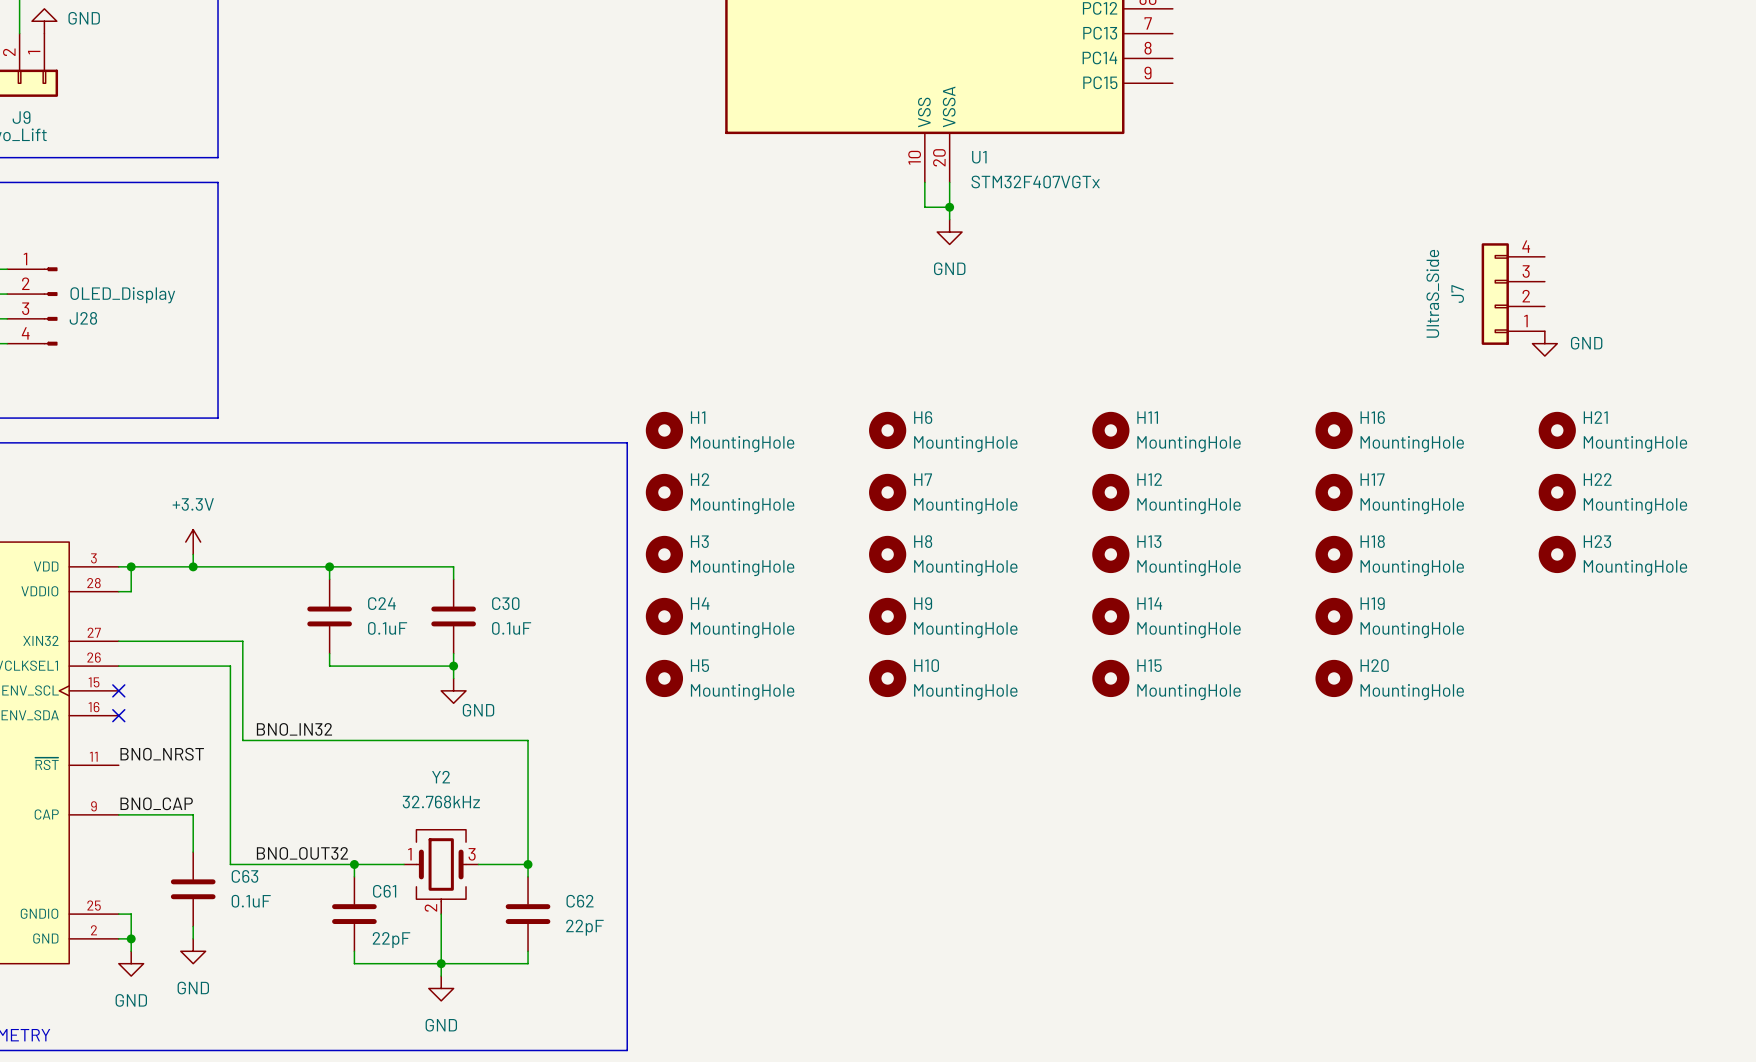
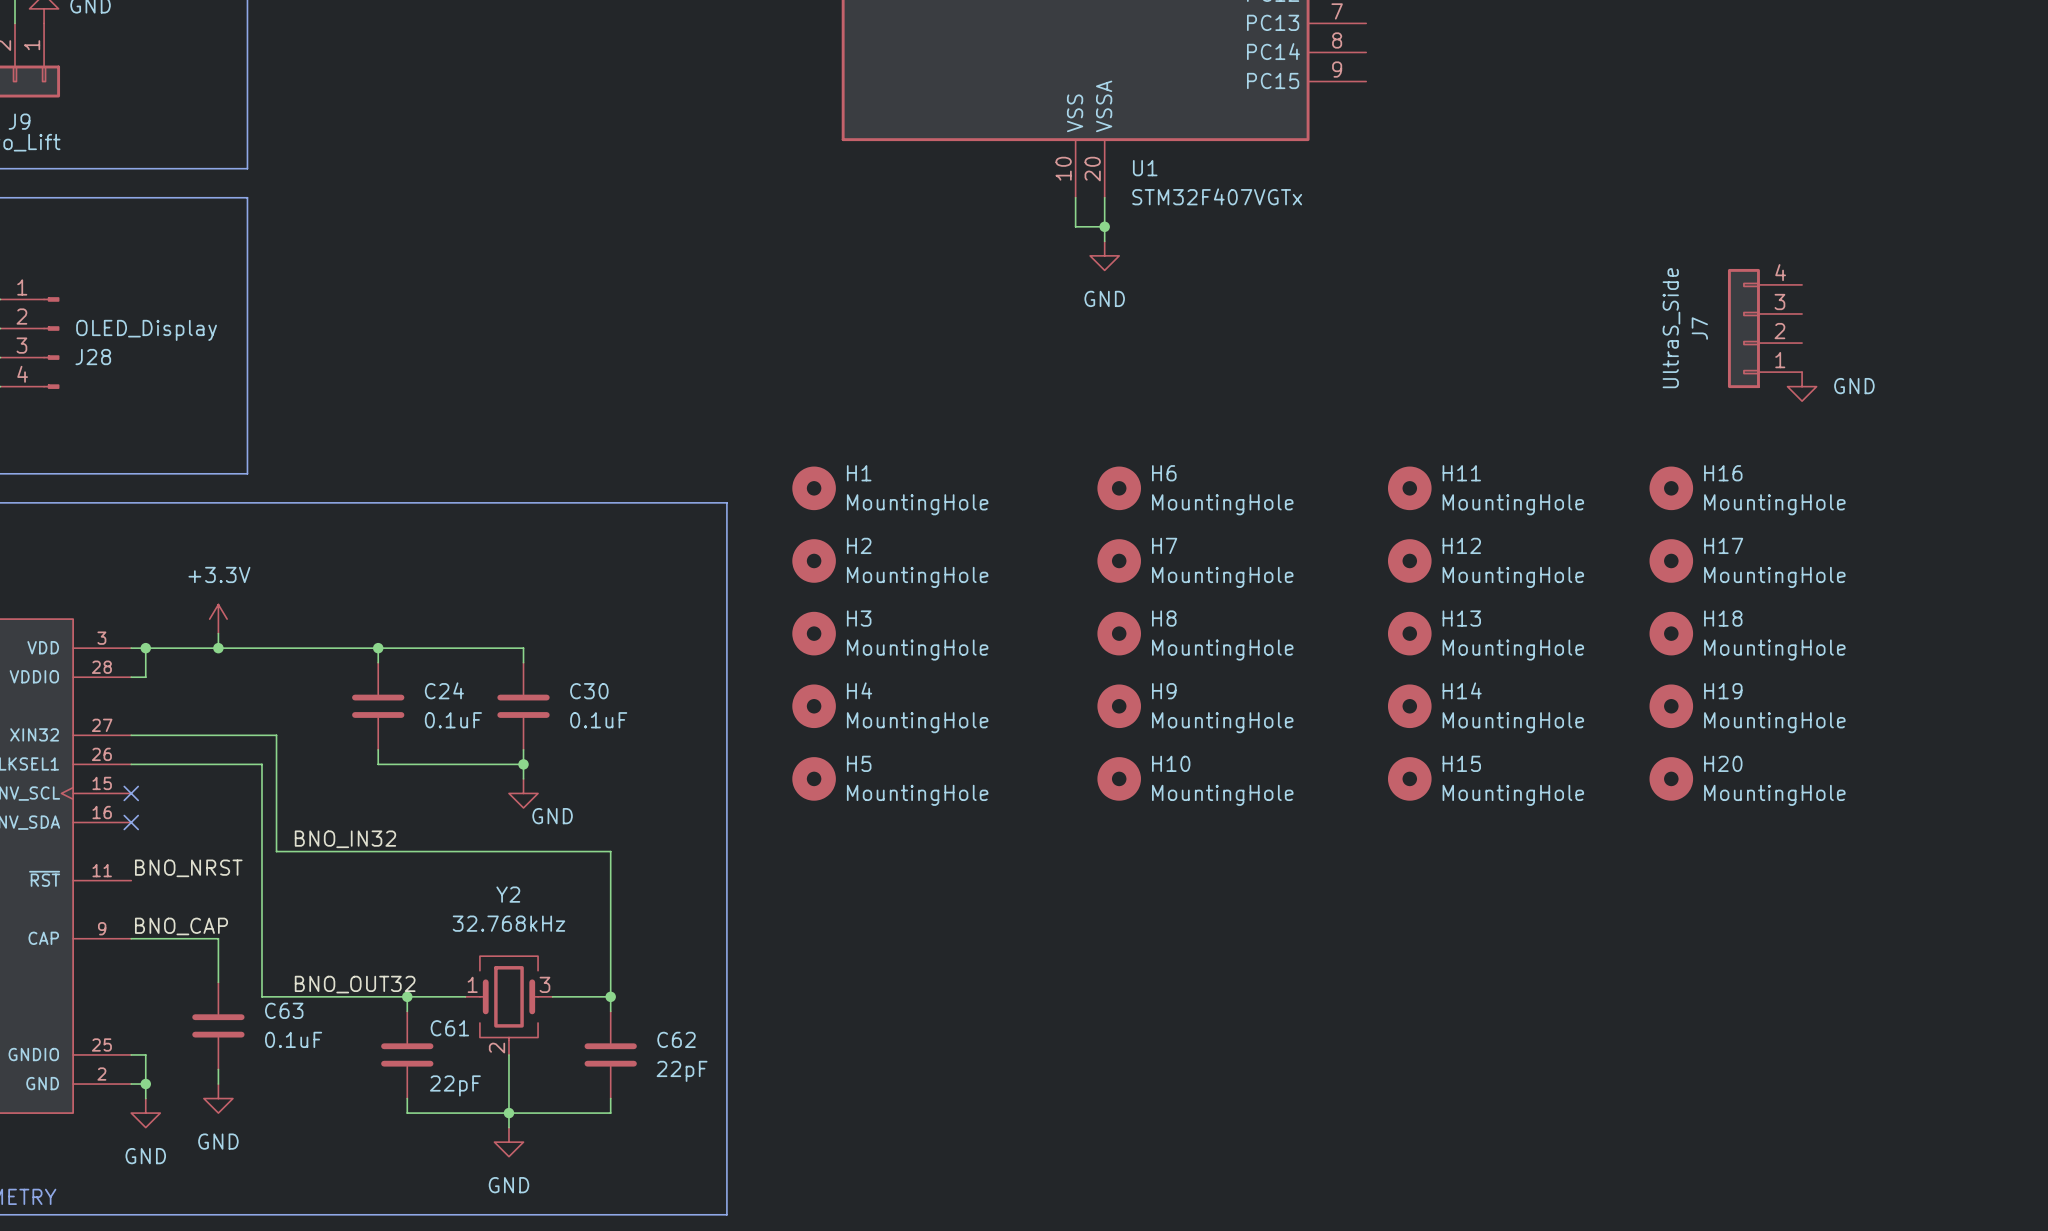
H1 position: (664, 430) -> (814, 488)
H6 position: (887, 430) -> (1119, 488)
H11 position: (1110, 430) -> (1409, 488)
H16 position: (1334, 430) -> (1671, 488)
H21: MountingHole (1557, 430) -> none
H2 position: (664, 492) -> (814, 560)
H7 position: (887, 492) -> (1119, 560)
H12 position: (1110, 492) -> (1409, 560)
H17 position: (1334, 492) -> (1671, 560)
H22: MountingHole (1557, 492) -> none
H3 position: (664, 554) -> (814, 633)
H8 position: (887, 554) -> (1119, 633)
H13 position: (1110, 554) -> (1409, 633)
H18 position: (1334, 554) -> (1671, 633)
H23: MountingHole (1557, 554) -> none
H4 position: (664, 616) -> (814, 706)
H9 position: (887, 616) -> (1119, 706)
H14 position: (1110, 616) -> (1409, 706)
H19 position: (1334, 616) -> (1671, 706)
H5 position: (664, 678) -> (814, 778)
H10 position: (887, 678) -> (1119, 778)
H15 position: (1110, 678) -> (1409, 778)
H20 position: (1334, 678) -> (1671, 778)

